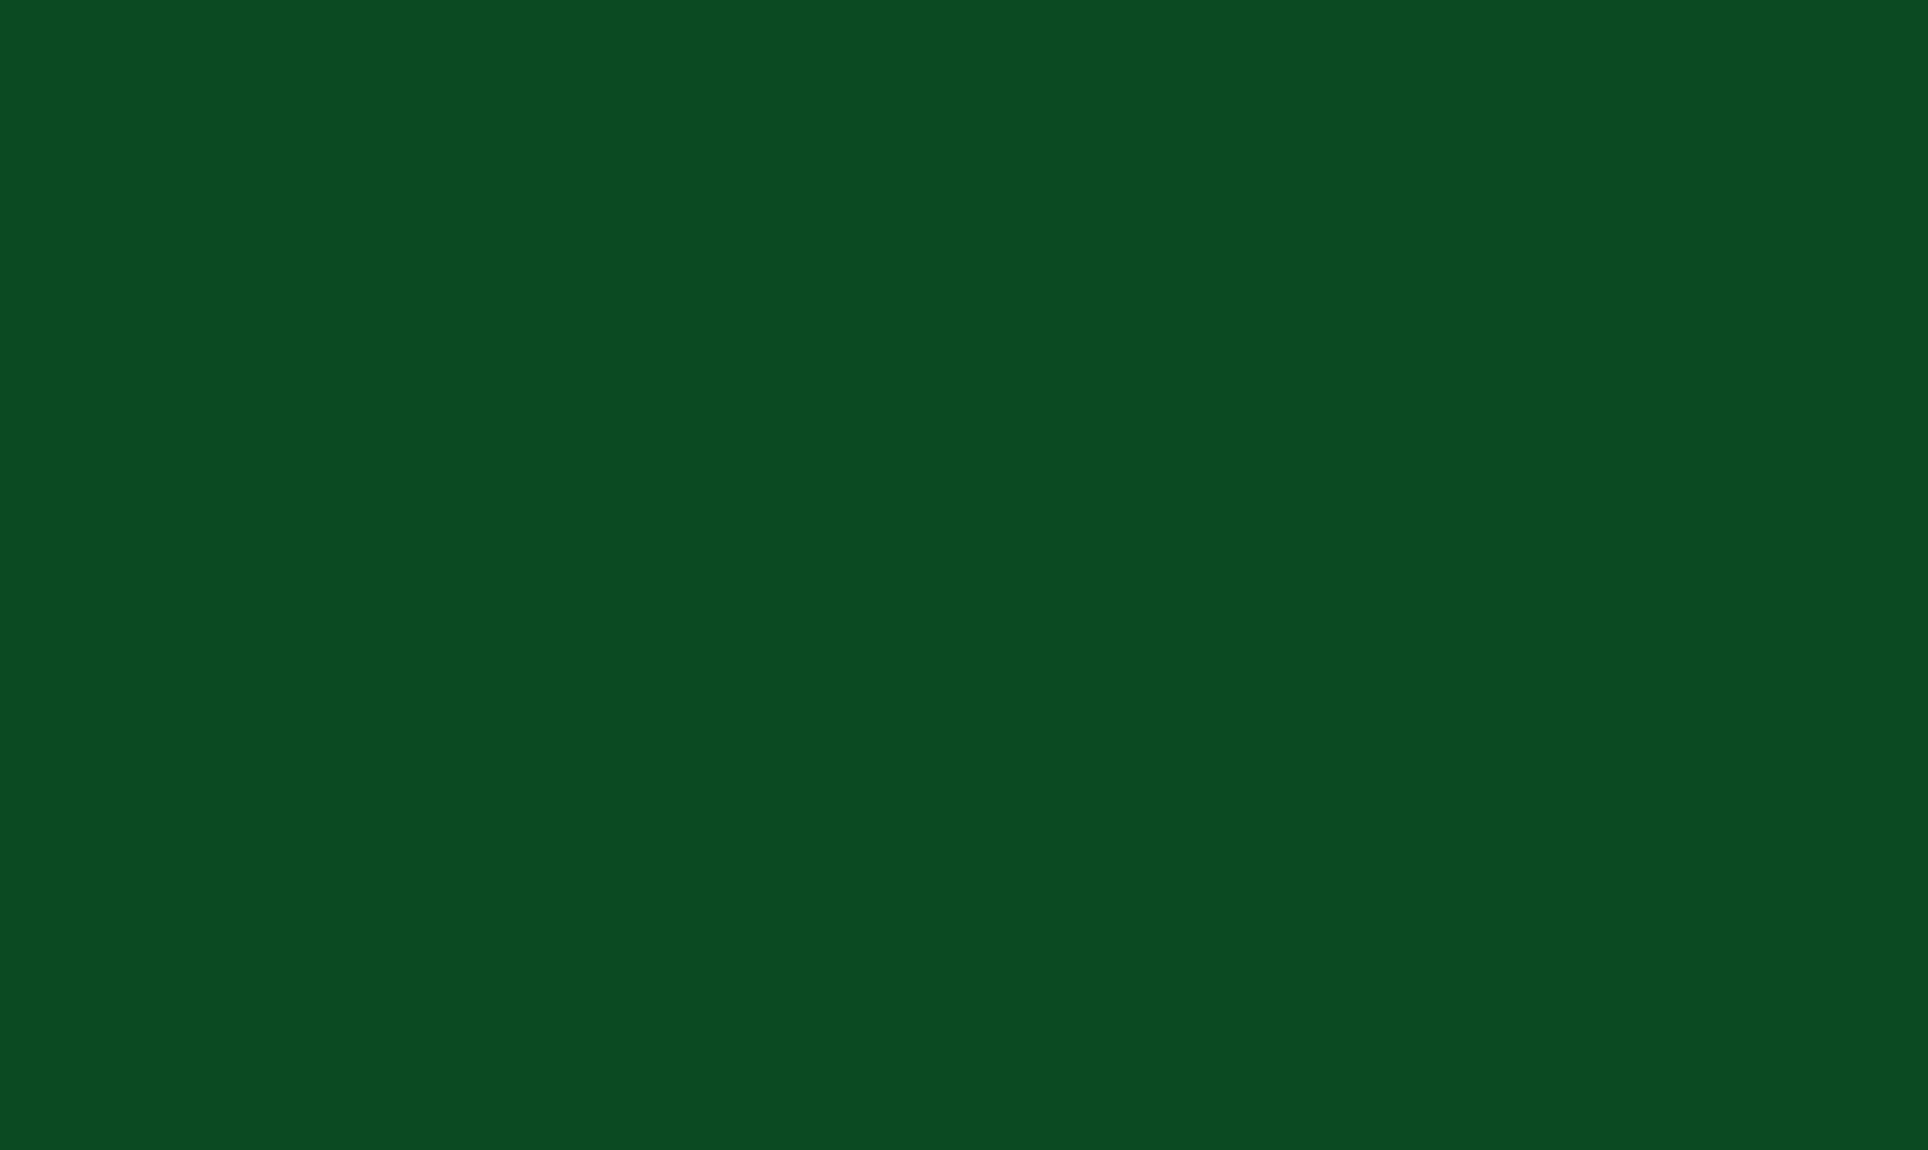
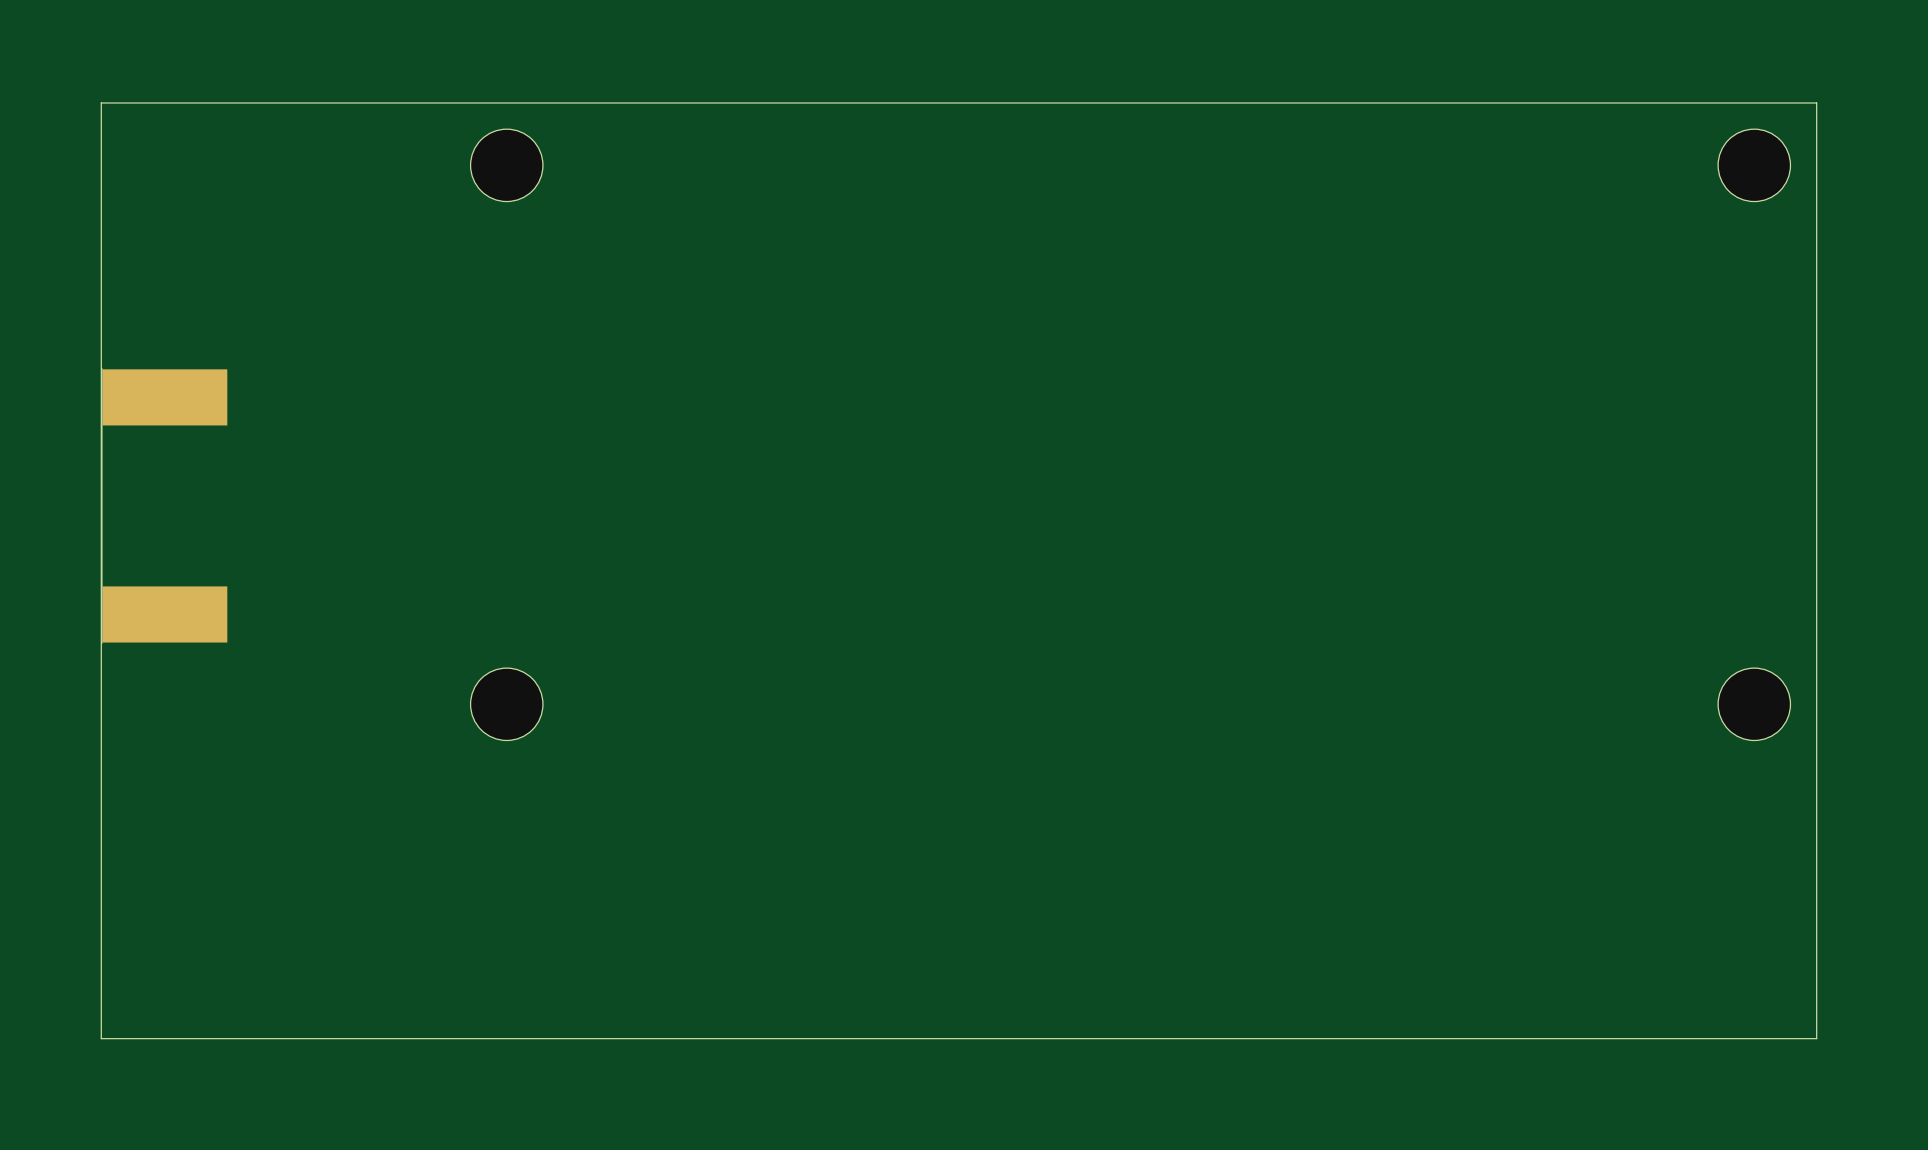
board edge: none -> (1816, 102) (101, 102) (101, 1038) (1816, 1038) (1816, 102)
hole: none -> (506, 165)
hole: none -> (1754, 165)
part: none -> (164, 505)
hole: none -> (506, 704)
hole: none -> (1754, 704)

